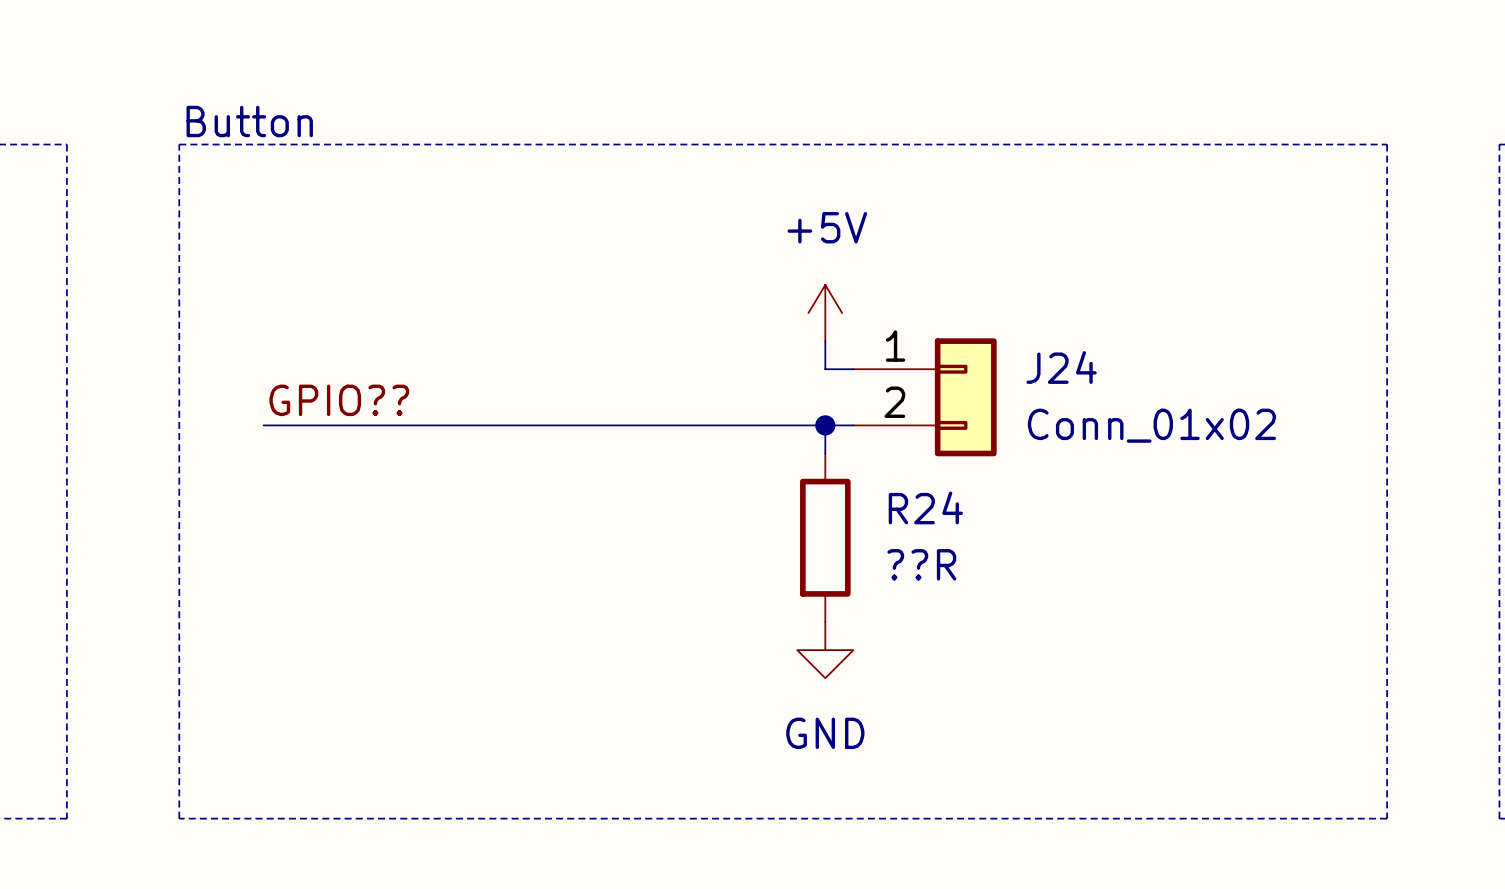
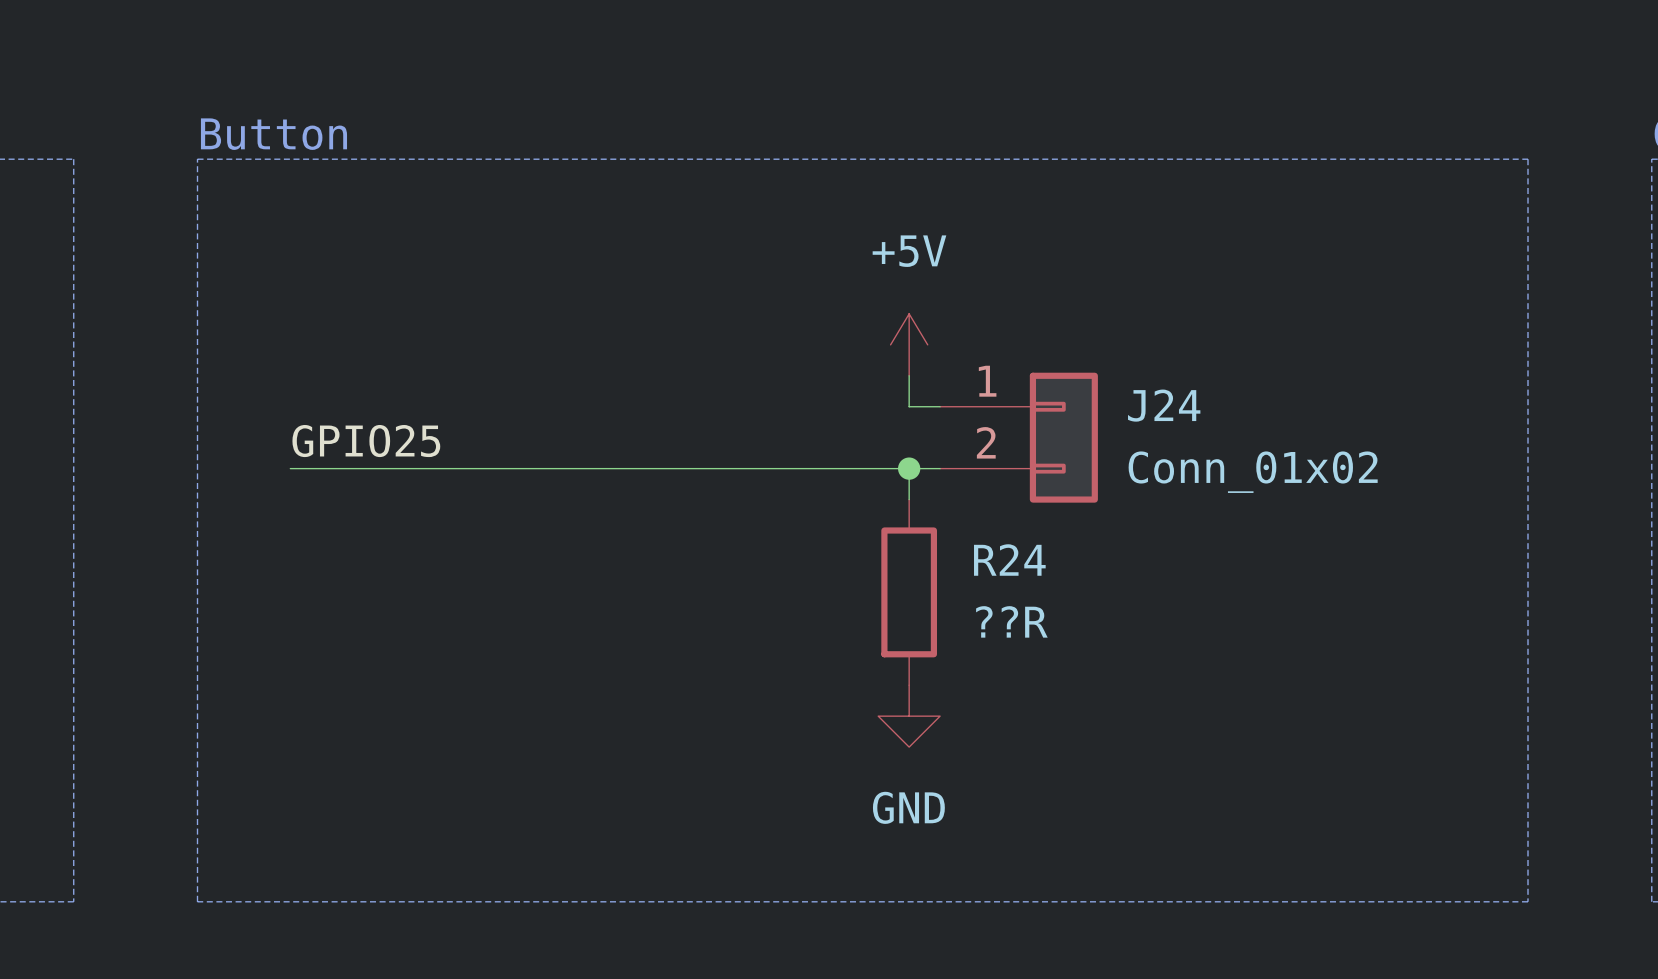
label: GPIO?? (339, 400) -> GPIO25 (366, 441)

